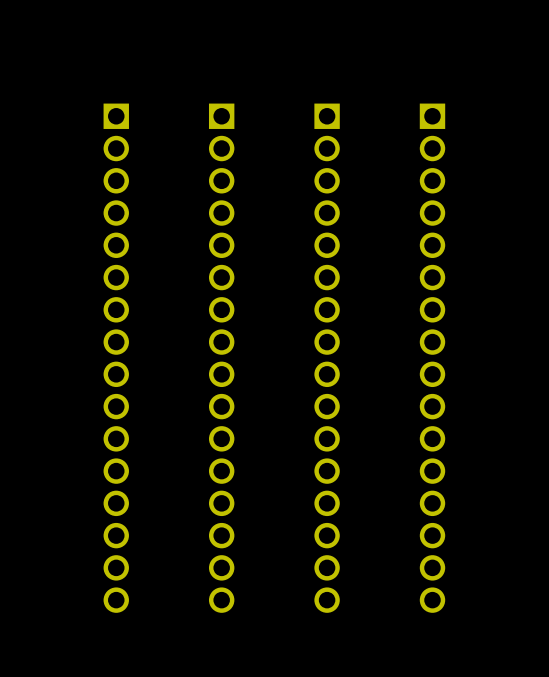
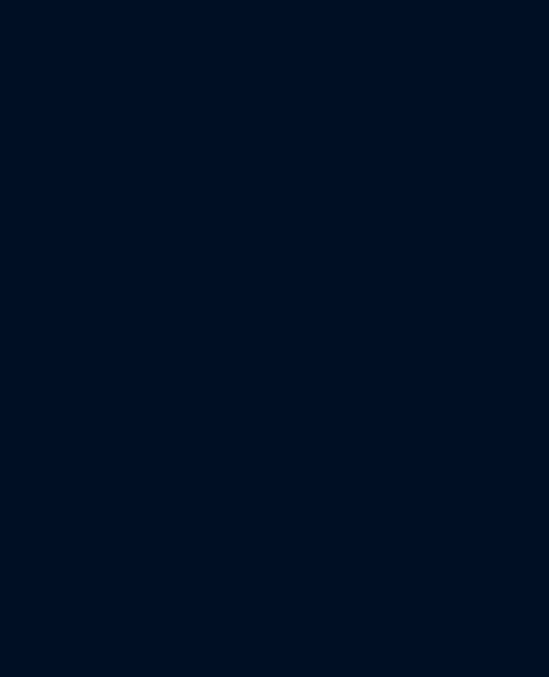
part: (116, 358) -> none
part: (221, 358) -> none
part: (327, 358) -> none
part: (432, 358) -> none

